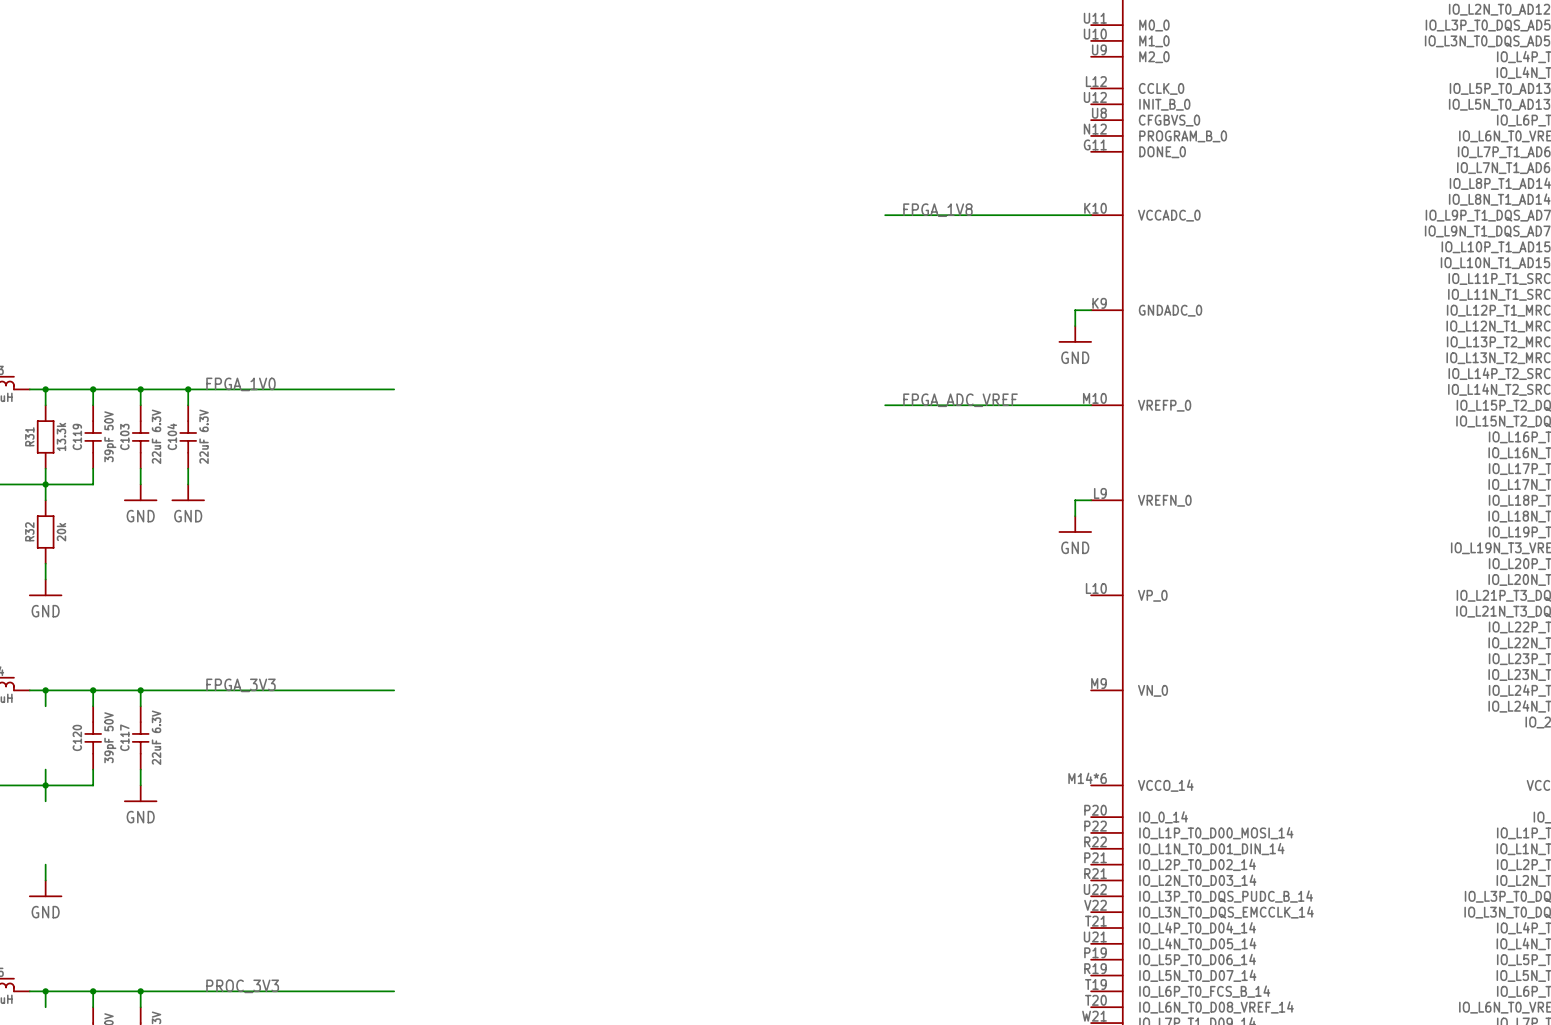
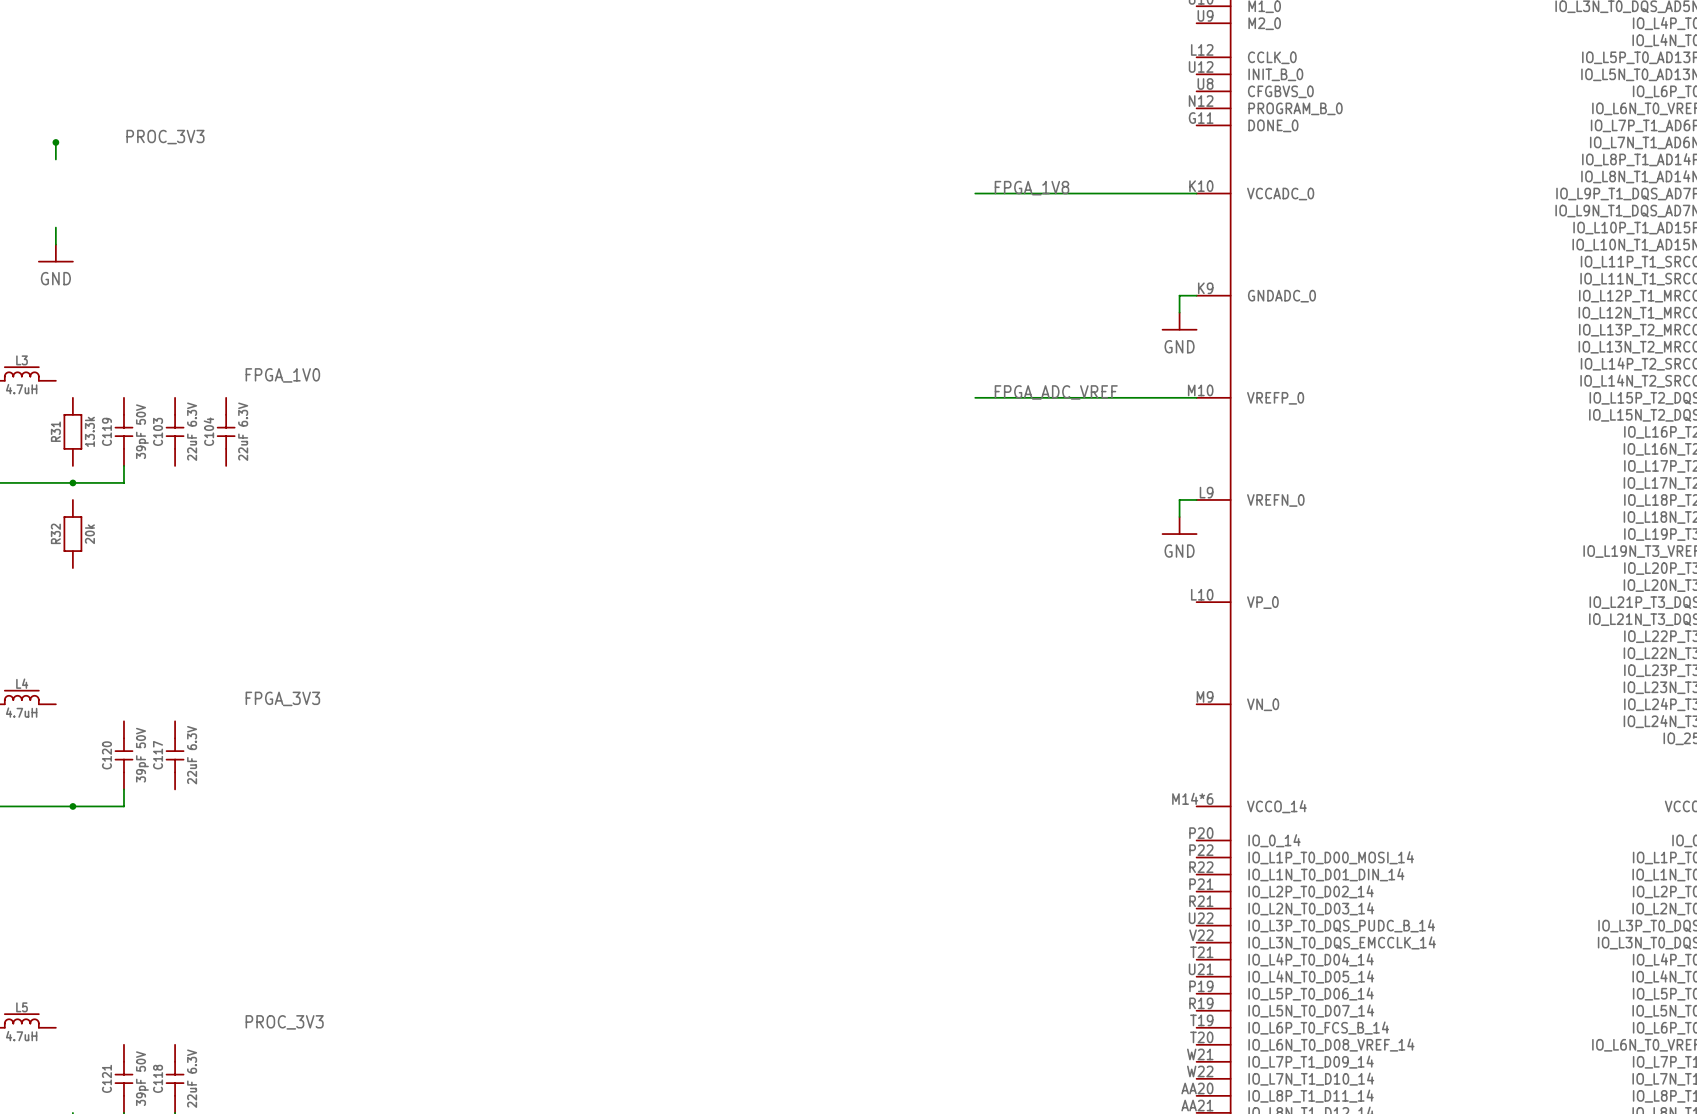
label: none -> PROC_3V3 (165, 137)
wire: none -> (55, 142) (55, 159)
junction: none -> (55, 142)
power symbol: none -> GND (55, 253)
wire: (29, 389) (394, 389) -> none
wire: (45, 389) (45, 405) -> (55, 227) (55, 244)
junction: (45, 389) -> none
wire: (93, 389) (93, 405) -> none
junction: (93, 389) -> none
wire: (140, 389) (140, 405) -> none
junction: (140, 389) -> none
wire: (188, 389) (188, 405) -> none
junction: (188, 389) -> none
wire: (45, 468) (45, 500) -> none
wire: (140, 468) (140, 484) -> none
wire: (188, 468) (188, 484) -> none
power symbol: GND (140, 492) -> none
power symbol: GND (188, 492) -> none
wire: (45, 563) (45, 579) -> none
power symbol: GND (45, 587) -> none
wire: (29, 690) (394, 690) -> none
wire: (45, 690) (45, 706) -> none
junction: (45, 690) -> none
wire: (93, 690) (93, 706) -> none
junction: (93, 690) -> none
wire: (140, 690) (140, 706) -> none
junction: (140, 690) -> none
wire: (45, 769) (45, 801) -> none
wire: (140, 769) (140, 785) -> none
power symbol: GND (140, 793) -> none
wire: (45, 864) (45, 880) -> none
power symbol: GND (45, 888) -> none
wire: (29, 991) (394, 991) -> none
wire: (45, 991) (45, 1007) -> none
junction: (45, 991) -> none
wire: (93, 991) (93, 1007) -> none
junction: (93, 991) -> none
wire: (140, 991) (140, 1007) -> none
junction: (140, 991) -> none

